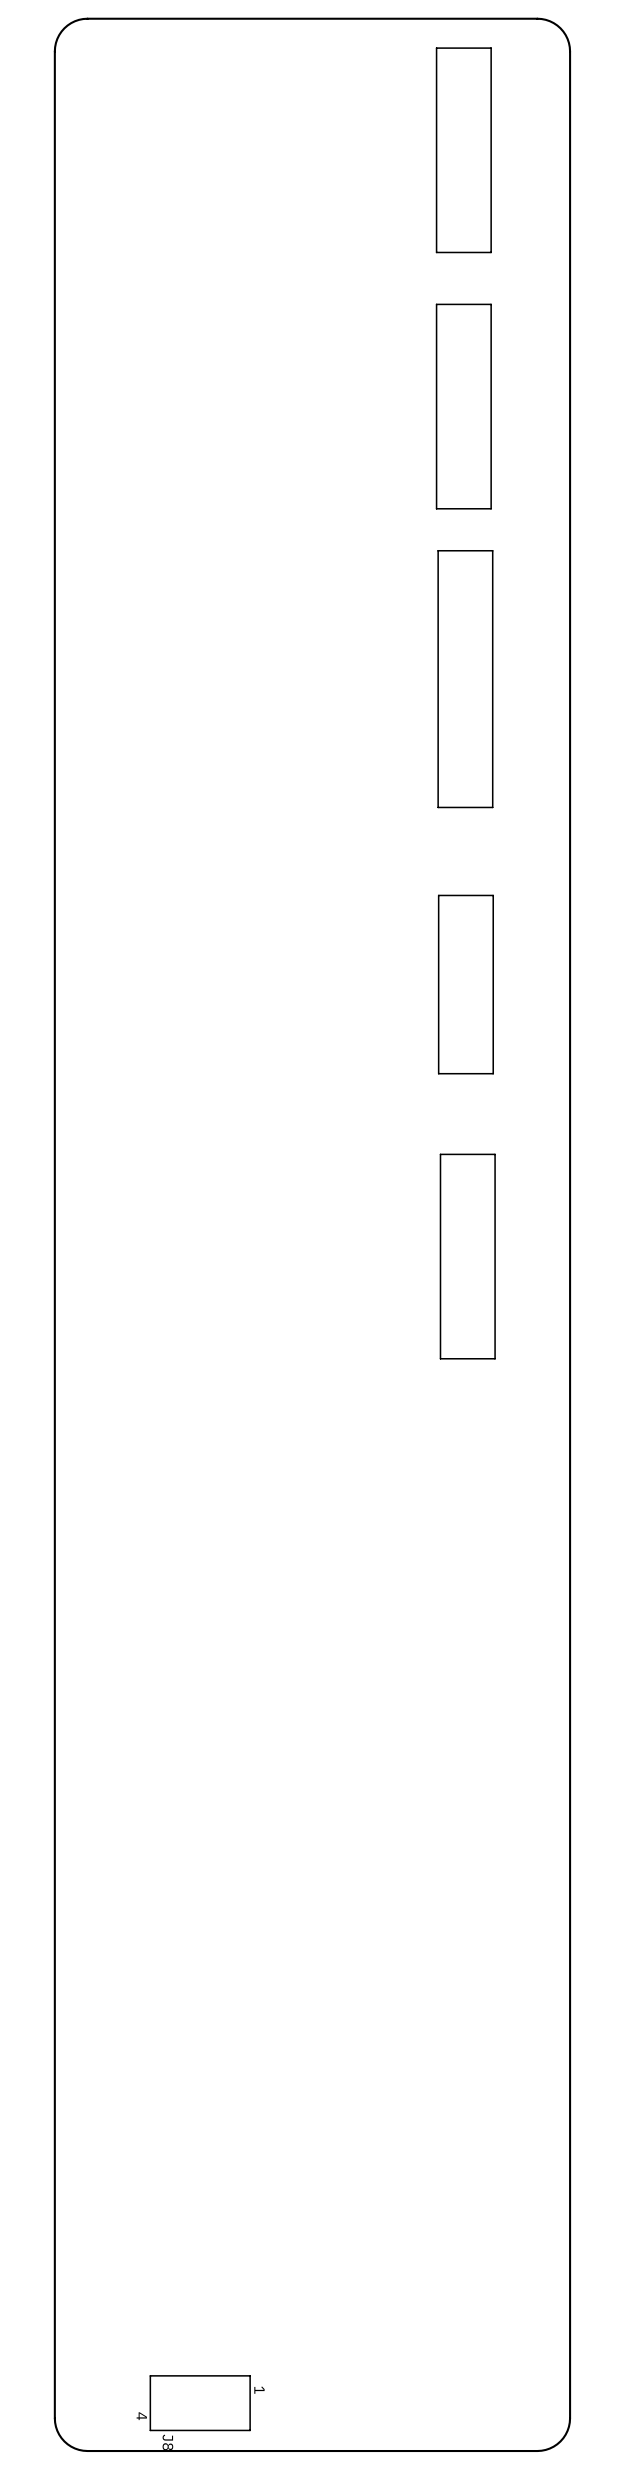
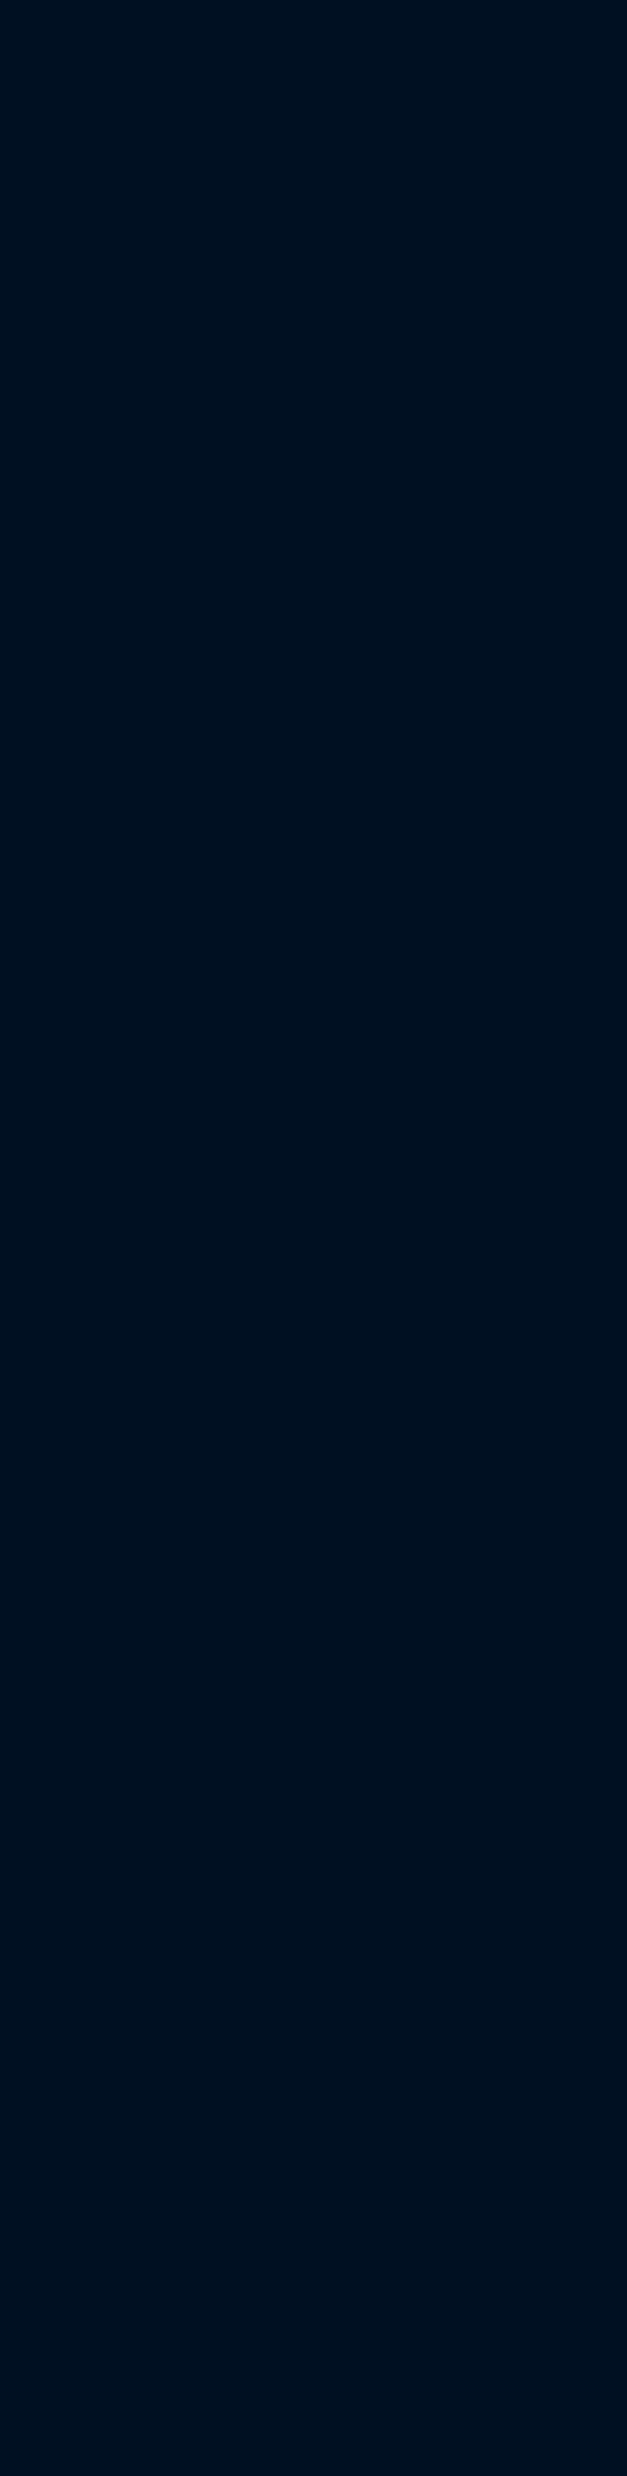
board edge: (537, 18) (87, 18) (75, 21) (67, 25) (59, 35) (55, 47) (54, 2418) (57, 2430) (64, 2441) (75, 2448) (83, 2450) (537, 2451) (549, 2448) (557, 2444) (565, 2434) (569, 2422) (570, 51) (567, 38) (560, 28) (549, 21) (537, 18) -> none
drawing: [435, 47, 492, 254] -> none
drawing: [435, 303, 492, 510] -> none
drawing: [437, 549, 494, 809] -> none
drawing: [437, 894, 495, 1075] -> none
drawing: [439, 1153, 496, 1360] -> none
J8: (200, 2403) -> none

